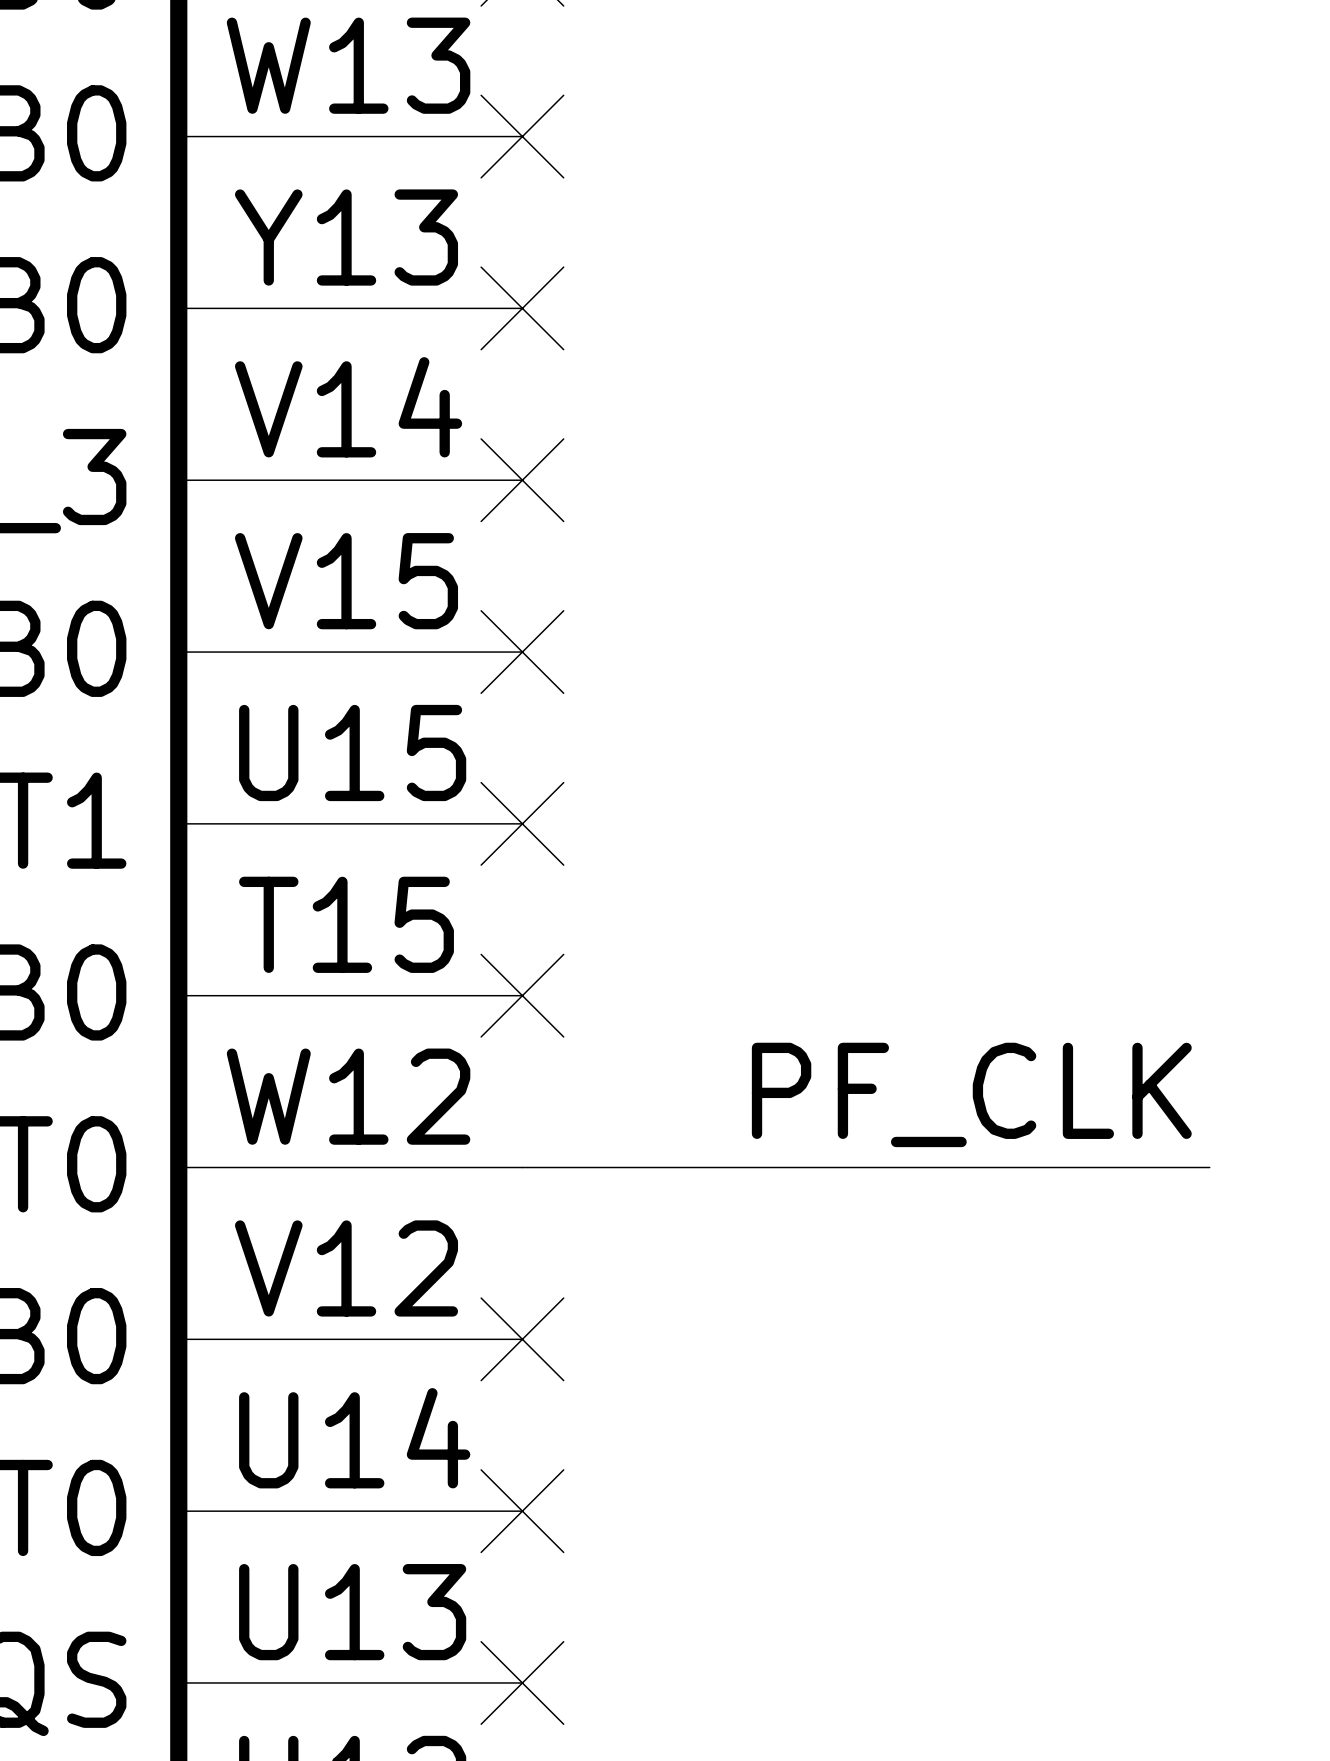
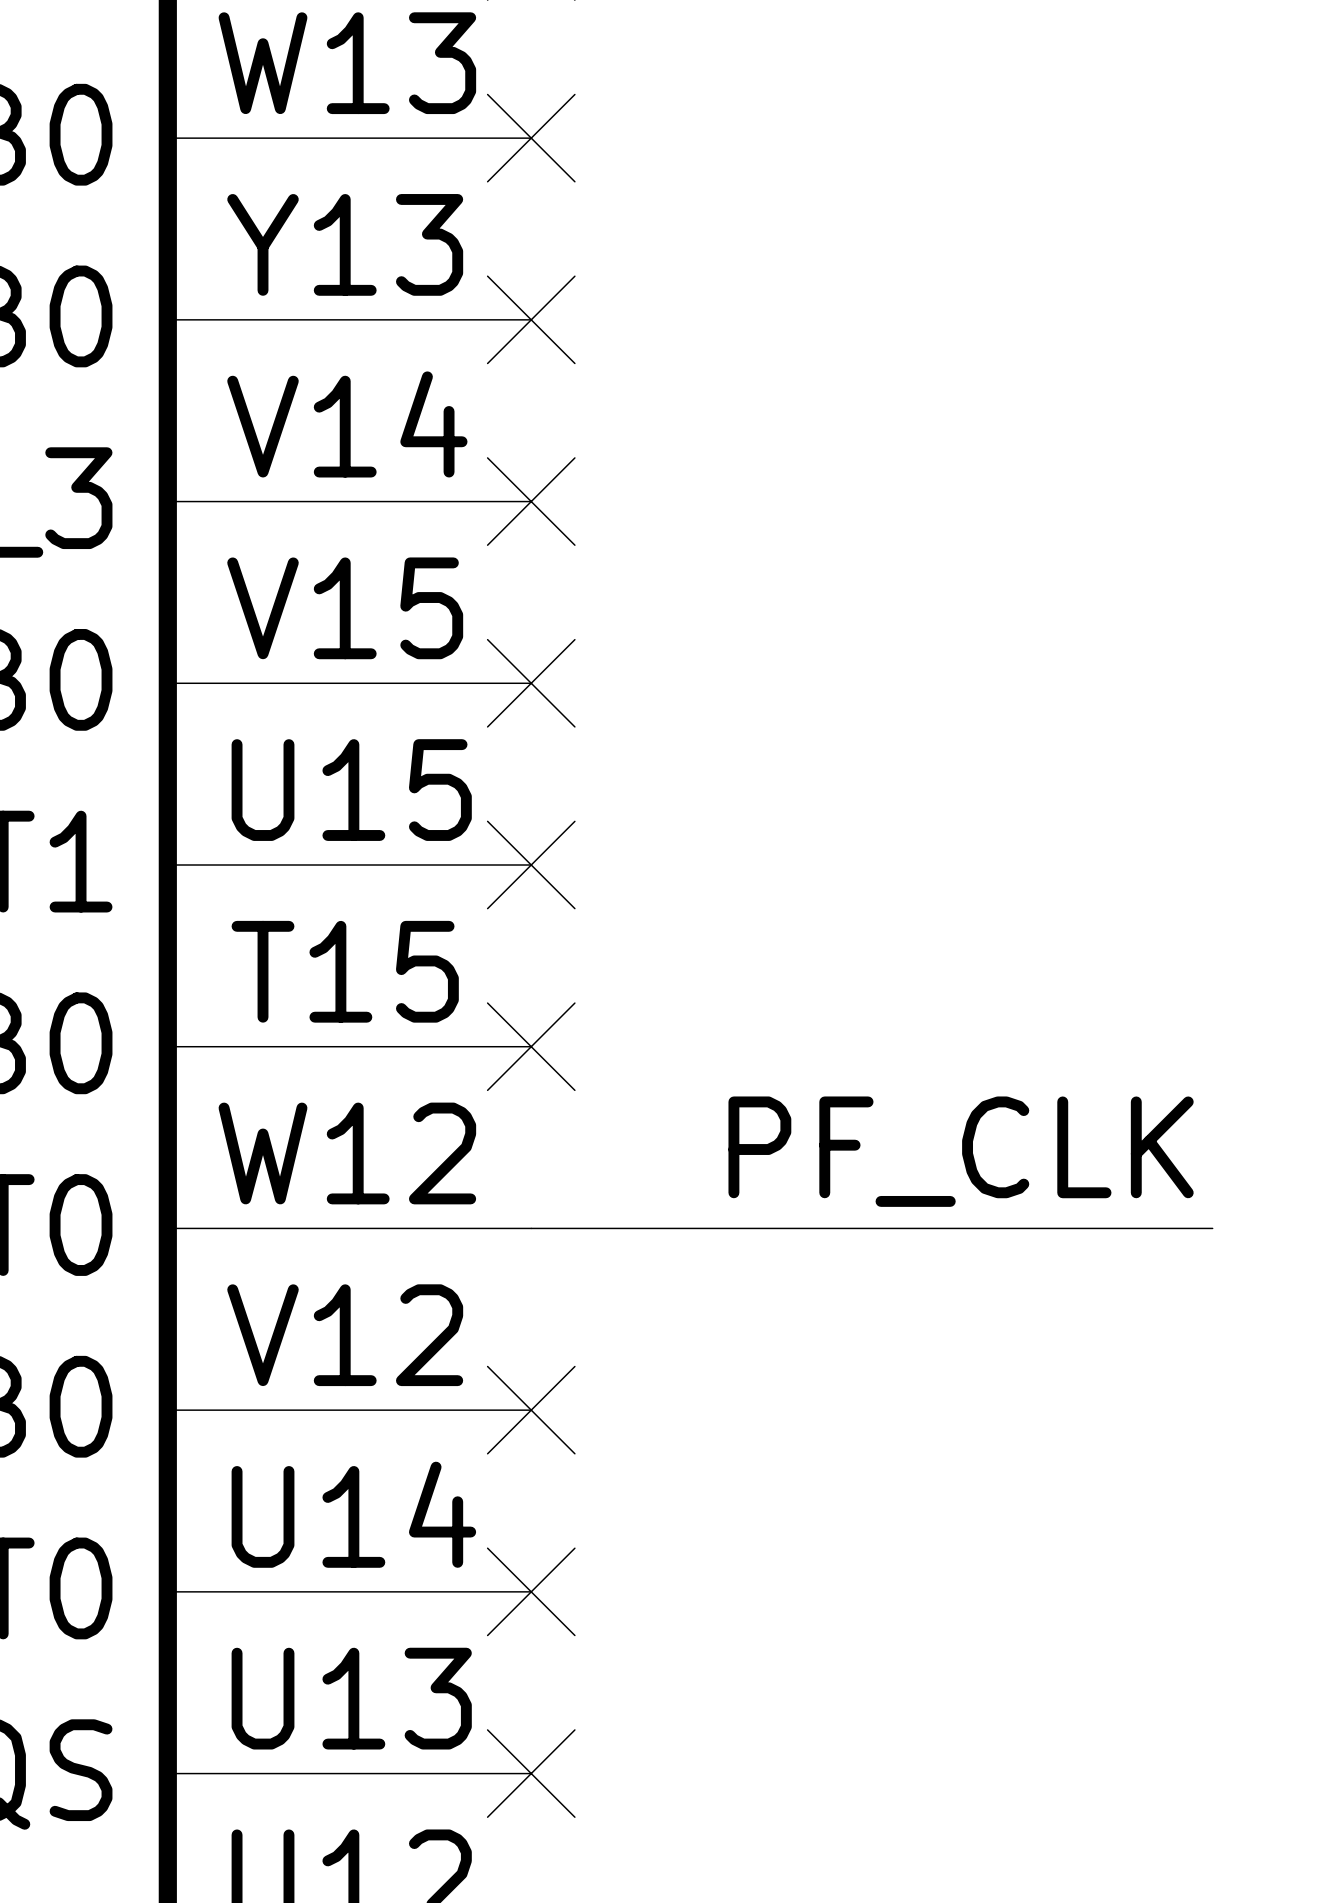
label position: PF_CLK (971, 1094) -> PF_CLK (961, 1151)
wire: (1166, 1167) (1209, 1167) -> none

